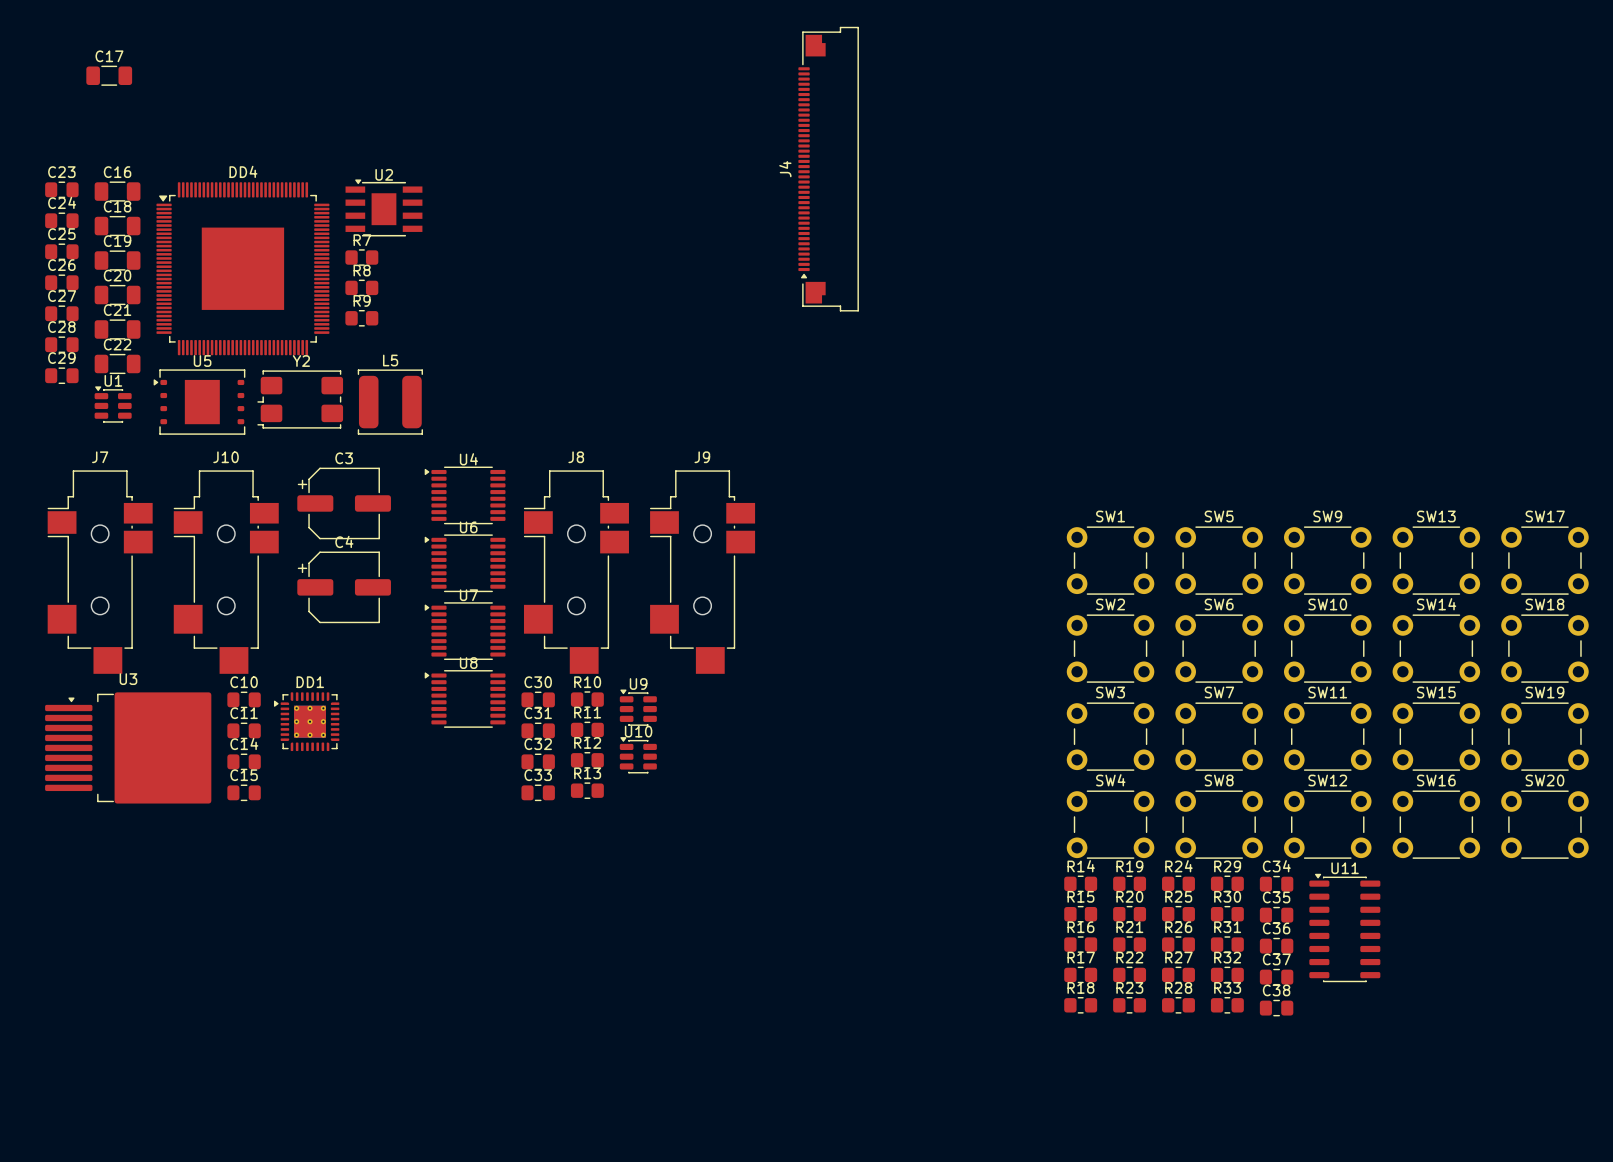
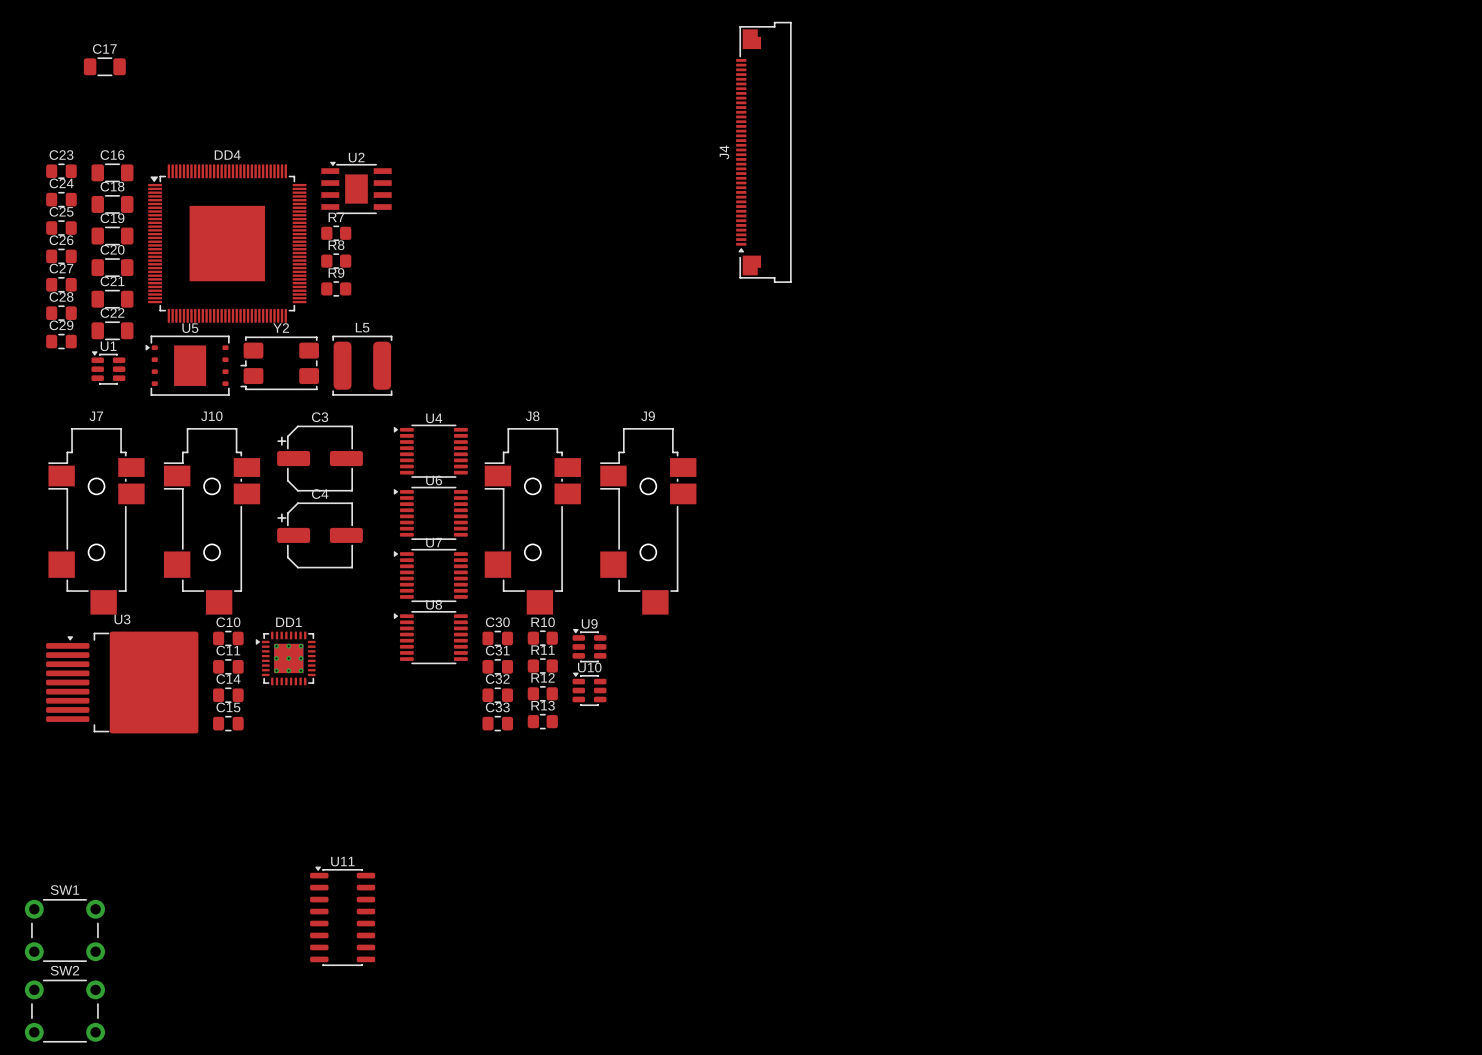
SW1 position: (1110, 560) -> (64, 930)
SW5: (1219, 560) -> none
SW9: (1327, 560) -> none
SW13: (1436, 560) -> none
SW17: (1544, 560) -> none
SW2 position: (1110, 648) -> (64, 1011)
SW6: (1219, 648) -> none
SW10: (1327, 648) -> none
SW14: (1436, 648) -> none
SW18: (1544, 648) -> none
SW3: (1110, 736) -> none
SW7: (1219, 736) -> none
SW11: (1327, 736) -> none
SW15: (1436, 736) -> none
SW19: (1544, 736) -> none
SW4: (1110, 824) -> none
SW8: (1219, 824) -> none
SW12: (1327, 824) -> none
SW16: (1436, 824) -> none
SW20: (1544, 824) -> none
R14: (1080, 883) -> none
R19: (1129, 883) -> none
R24: (1178, 883) -> none
R29: (1227, 883) -> none
C34: (1276, 884) -> none
R15: (1080, 914) -> none
R20: (1129, 914) -> none
R25: (1178, 914) -> none
R30: (1227, 914) -> none
C35: (1276, 915) -> none
U11 position: (1344, 927) -> (342, 916)
R16: (1080, 944) -> none
R21: (1129, 944) -> none
R26: (1178, 944) -> none
R31: (1227, 944) -> none
C36: (1276, 946) -> none
R17: (1080, 974) -> none
R22: (1129, 974) -> none
R27: (1178, 974) -> none
R32: (1227, 974) -> none
C37: (1276, 977) -> none
R18: (1080, 1005) -> none
R23: (1129, 1005) -> none
R28: (1178, 1005) -> none
R33: (1227, 1005) -> none
C38: (1276, 1008) -> none

